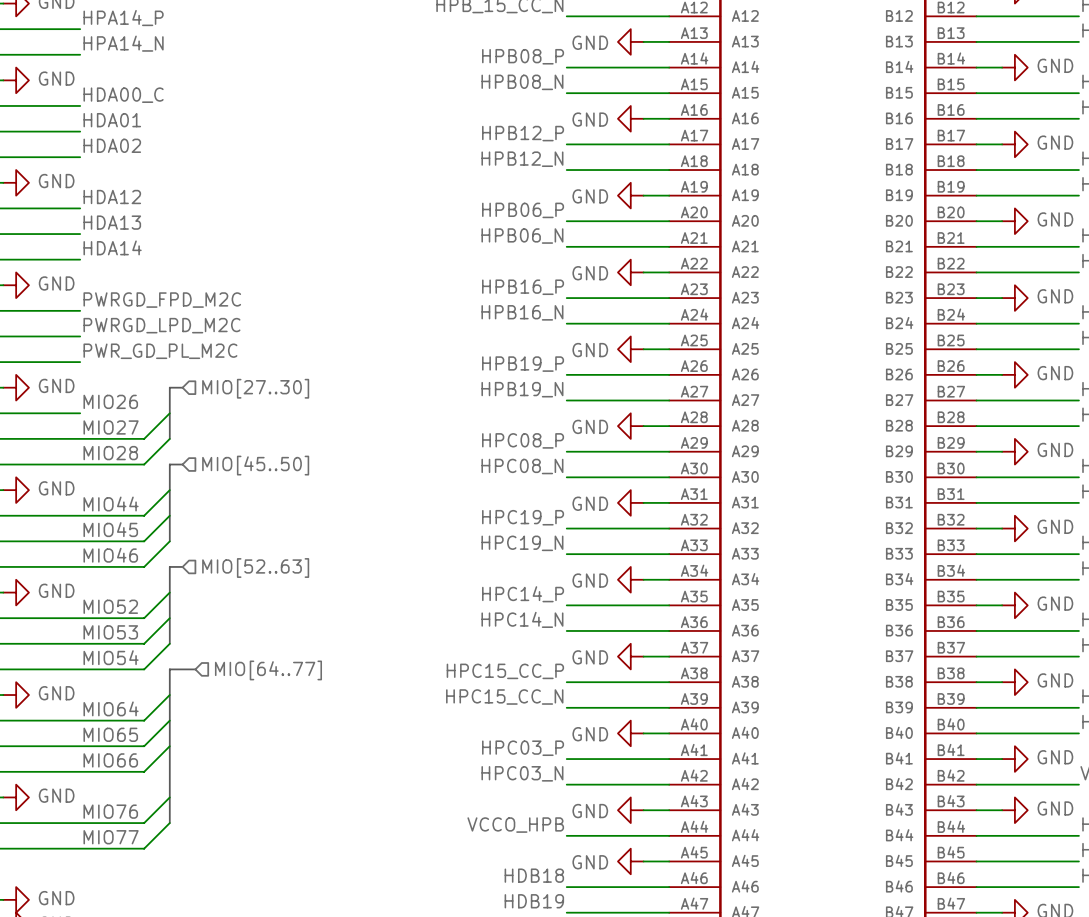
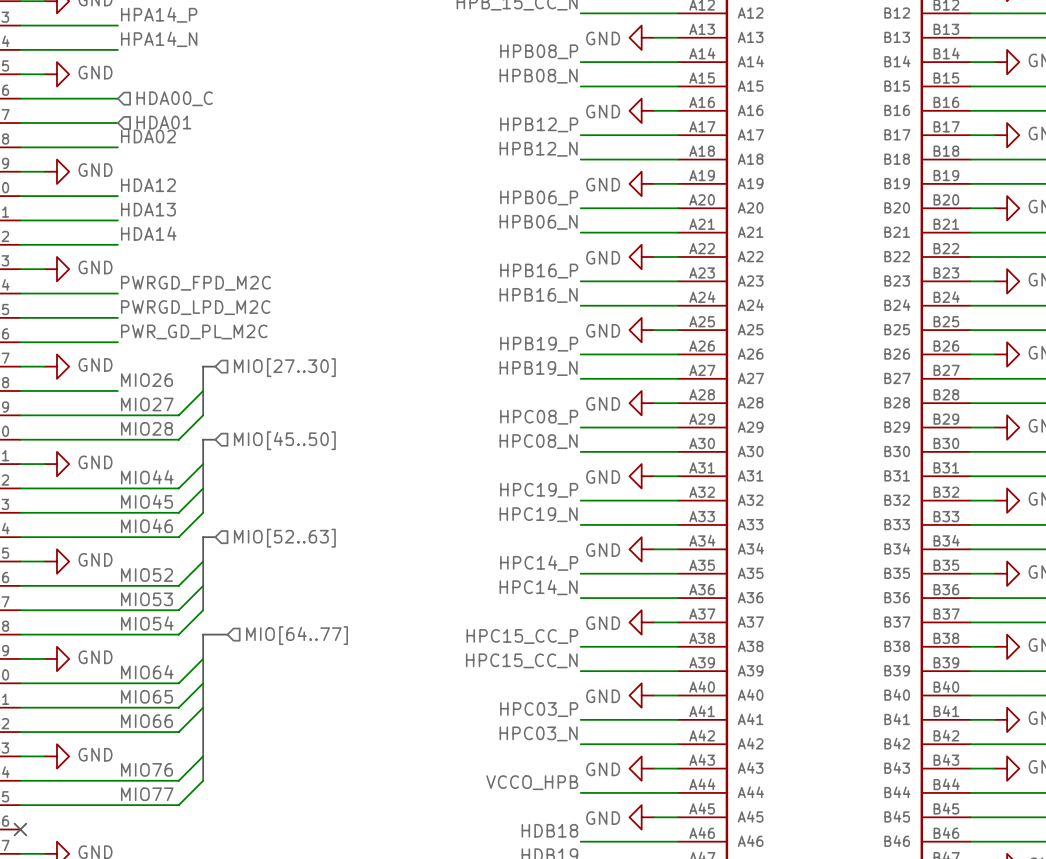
label: HDA00_C (123, 95) -> none
hierarchical label: none -> HDA00_C (174, 98)
label: HDA01 (112, 120) -> none
hierarchical label: none -> HDA01 (163, 122)

